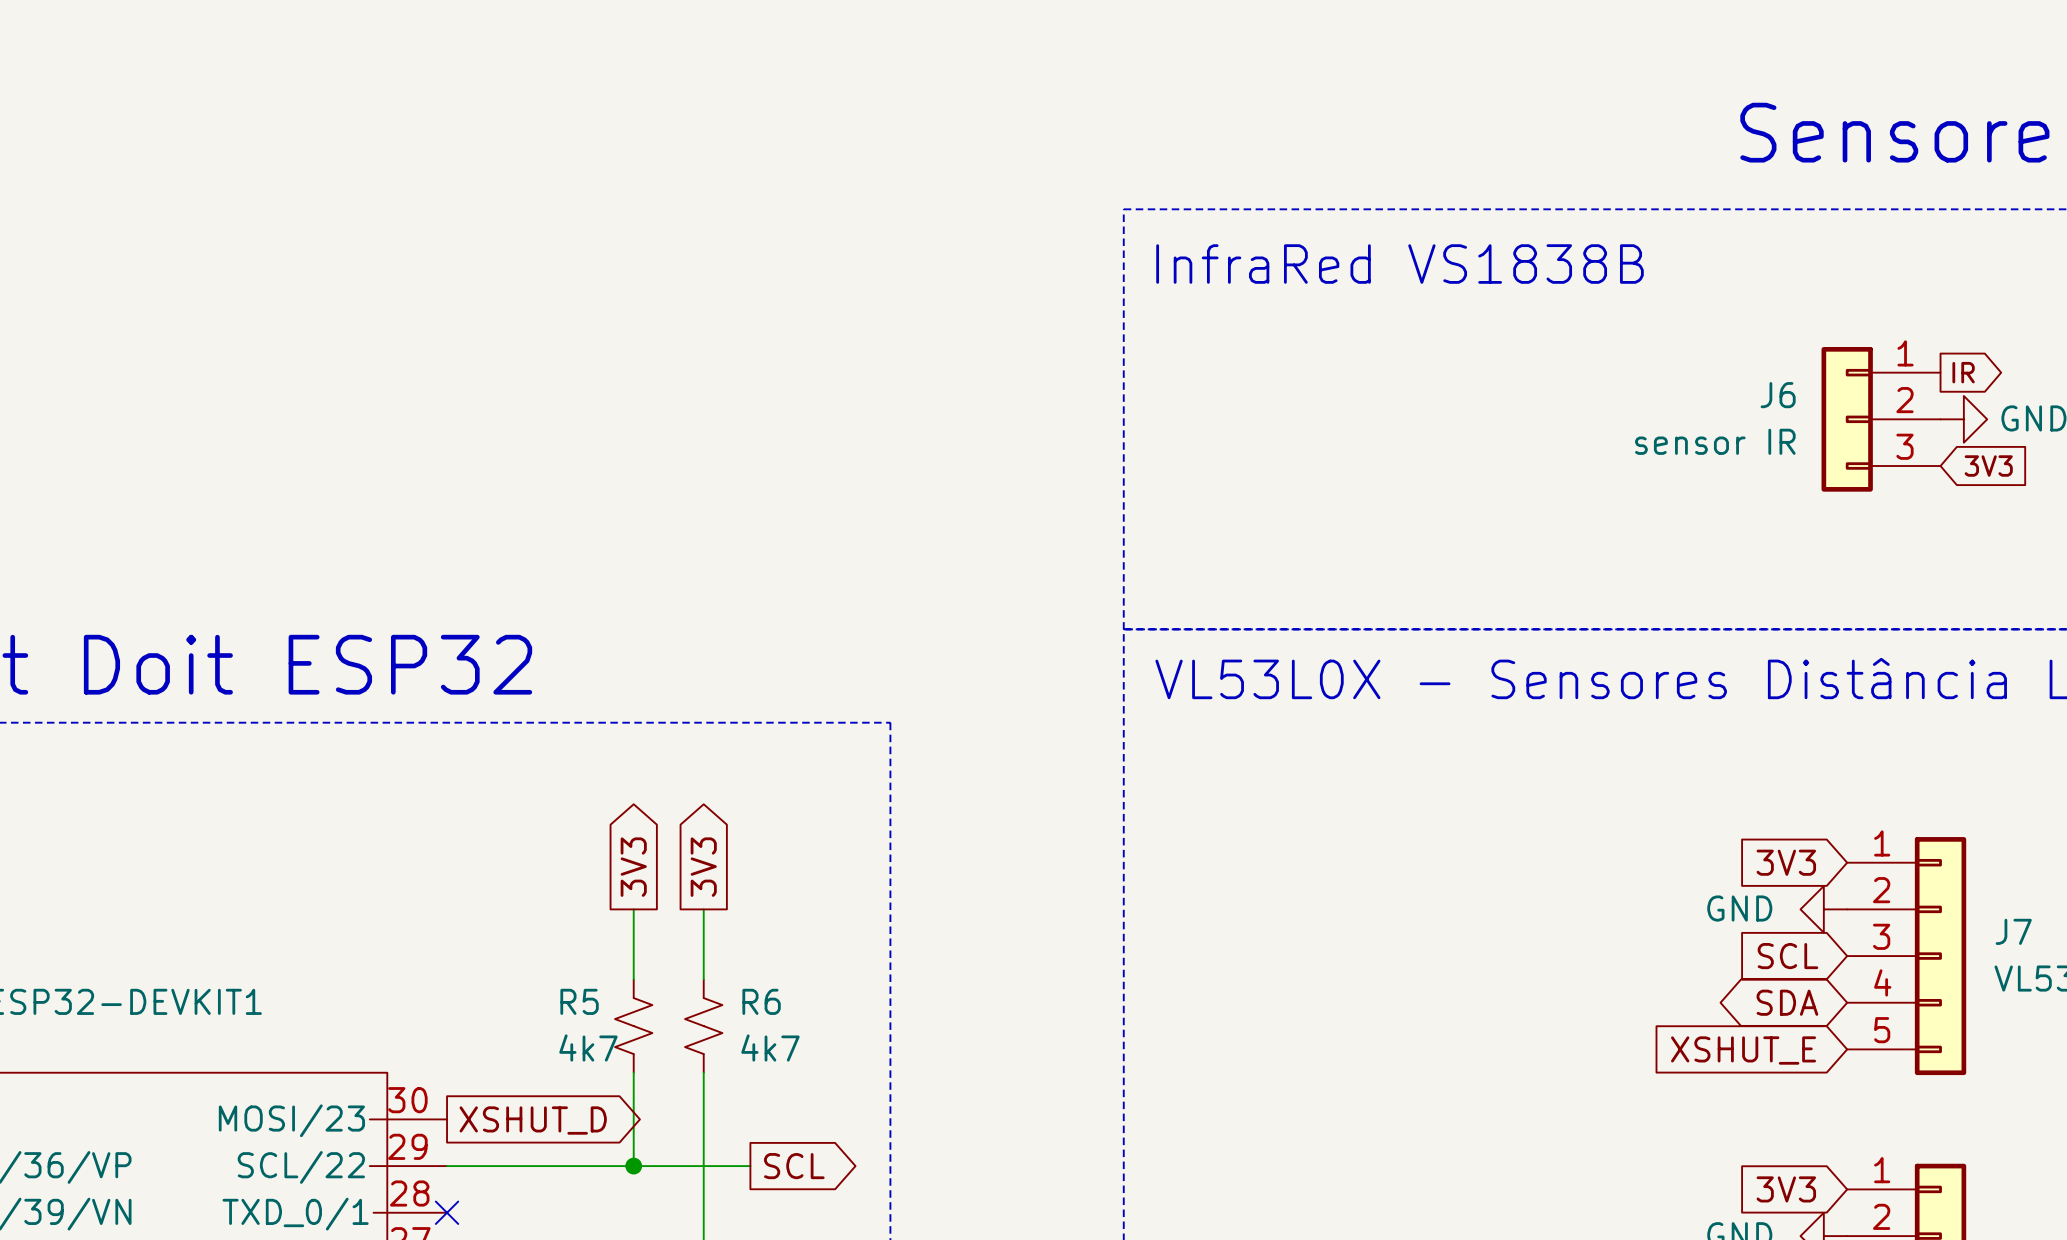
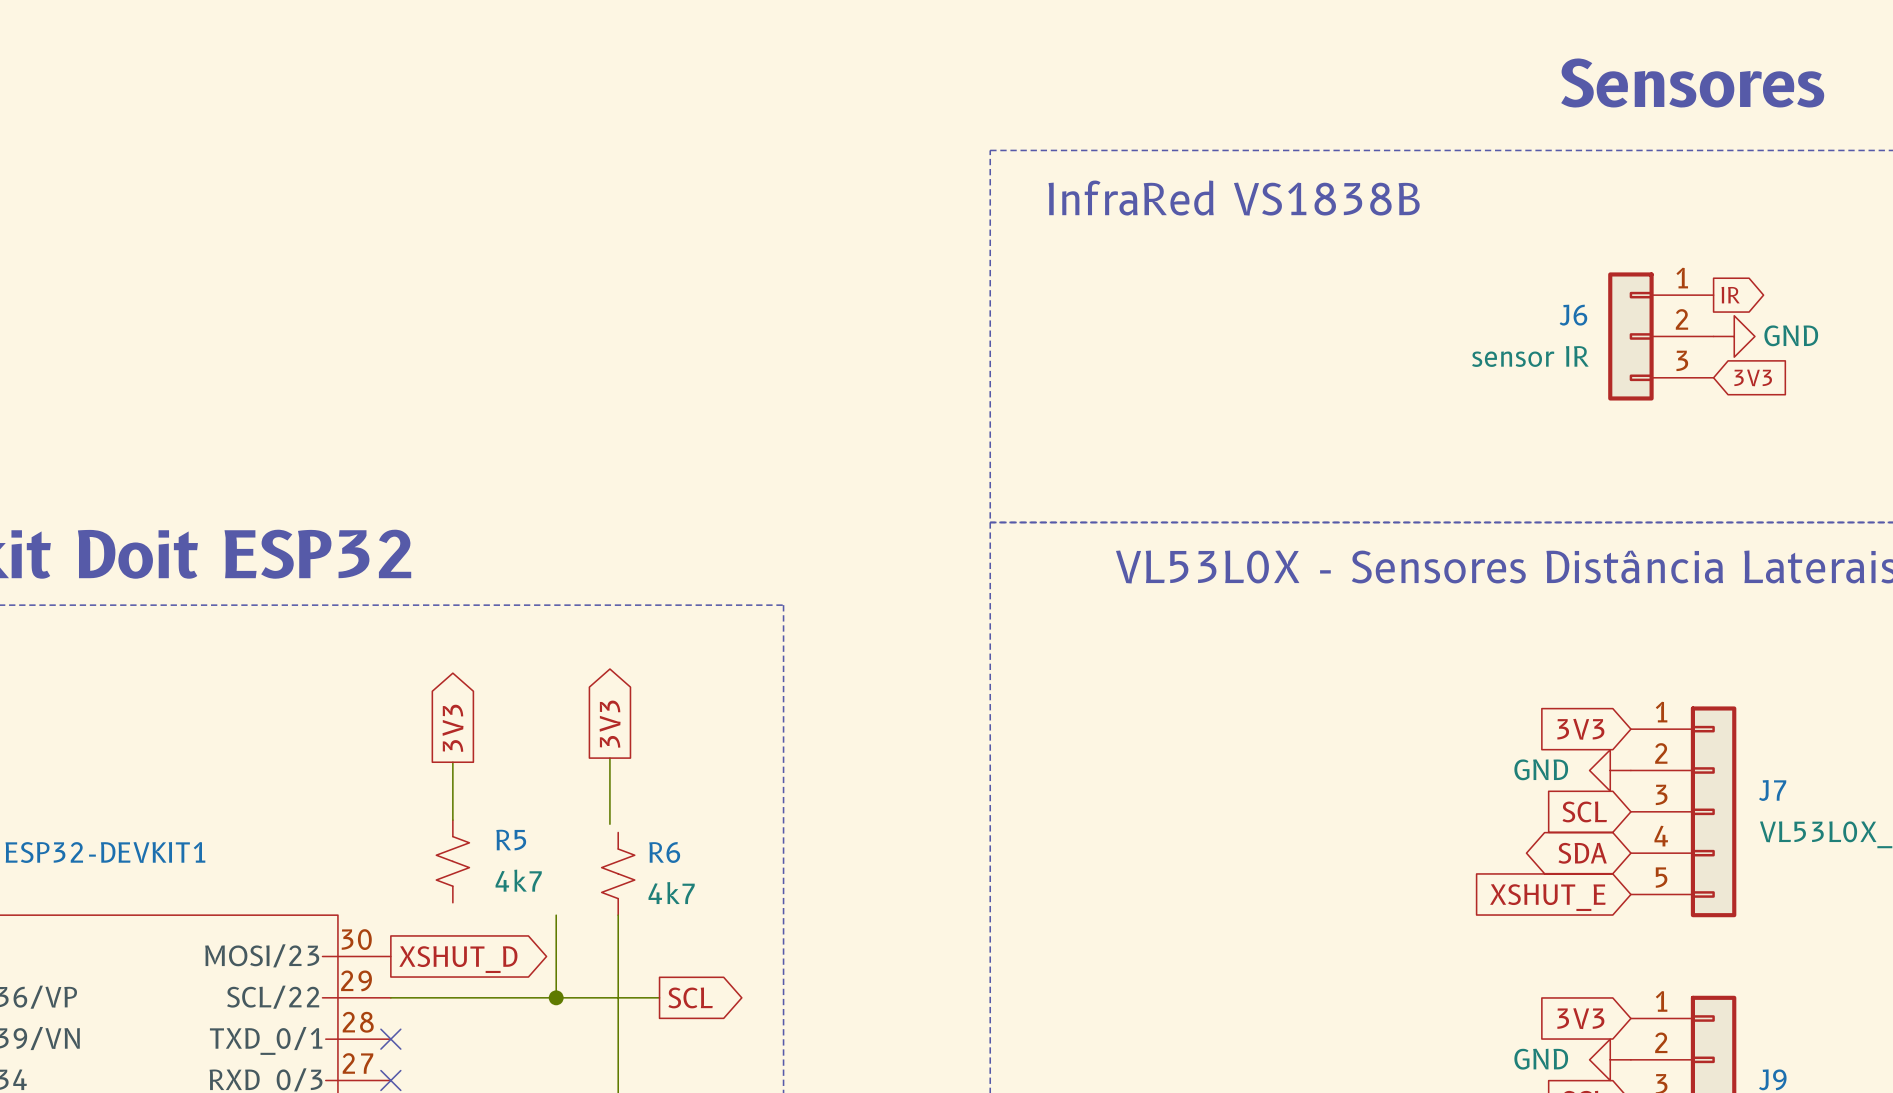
global label position: 3V3 (633, 867) -> 3V3 (453, 728)
global label position: 3V3 (703, 867) -> 3V3 (610, 724)
wire: none -> (609, 758) (609, 824)
wire: none -> (452, 762) (452, 820)
wire: (633, 909) (633, 979) -> none
wire: (703, 909) (703, 979) -> none
R5 name position: R5 (579, 1001) -> R5 (511, 840)
R5 position: (633, 1026) -> (452, 861)
R5 value position: 4k7 (588, 1047) -> 4k7 (518, 880)

